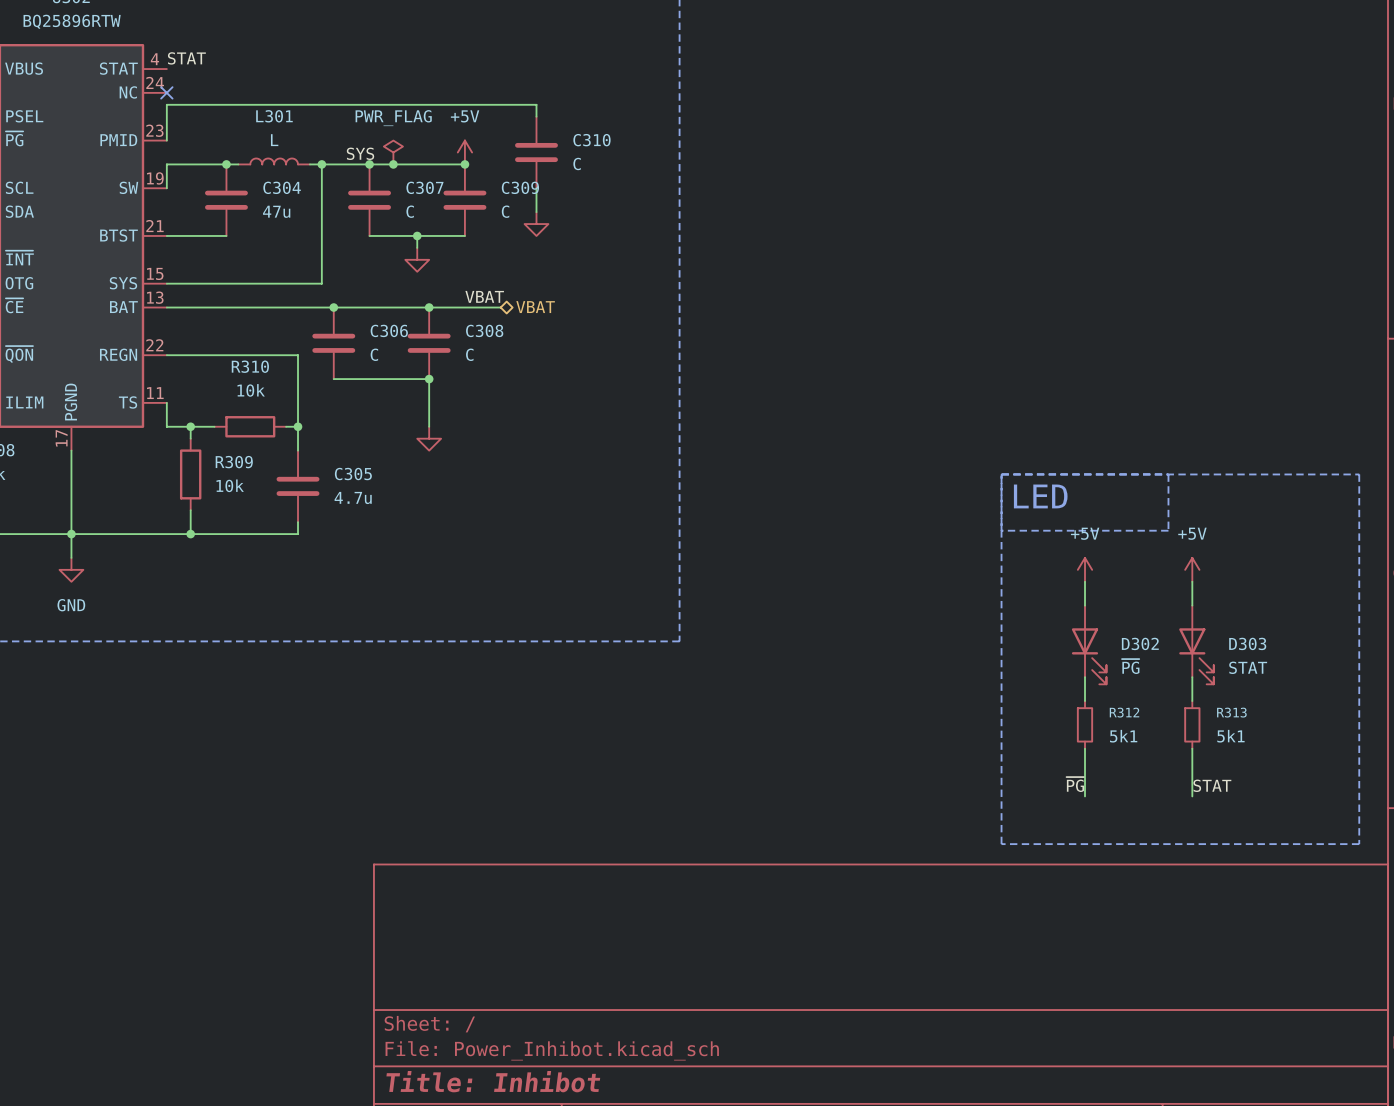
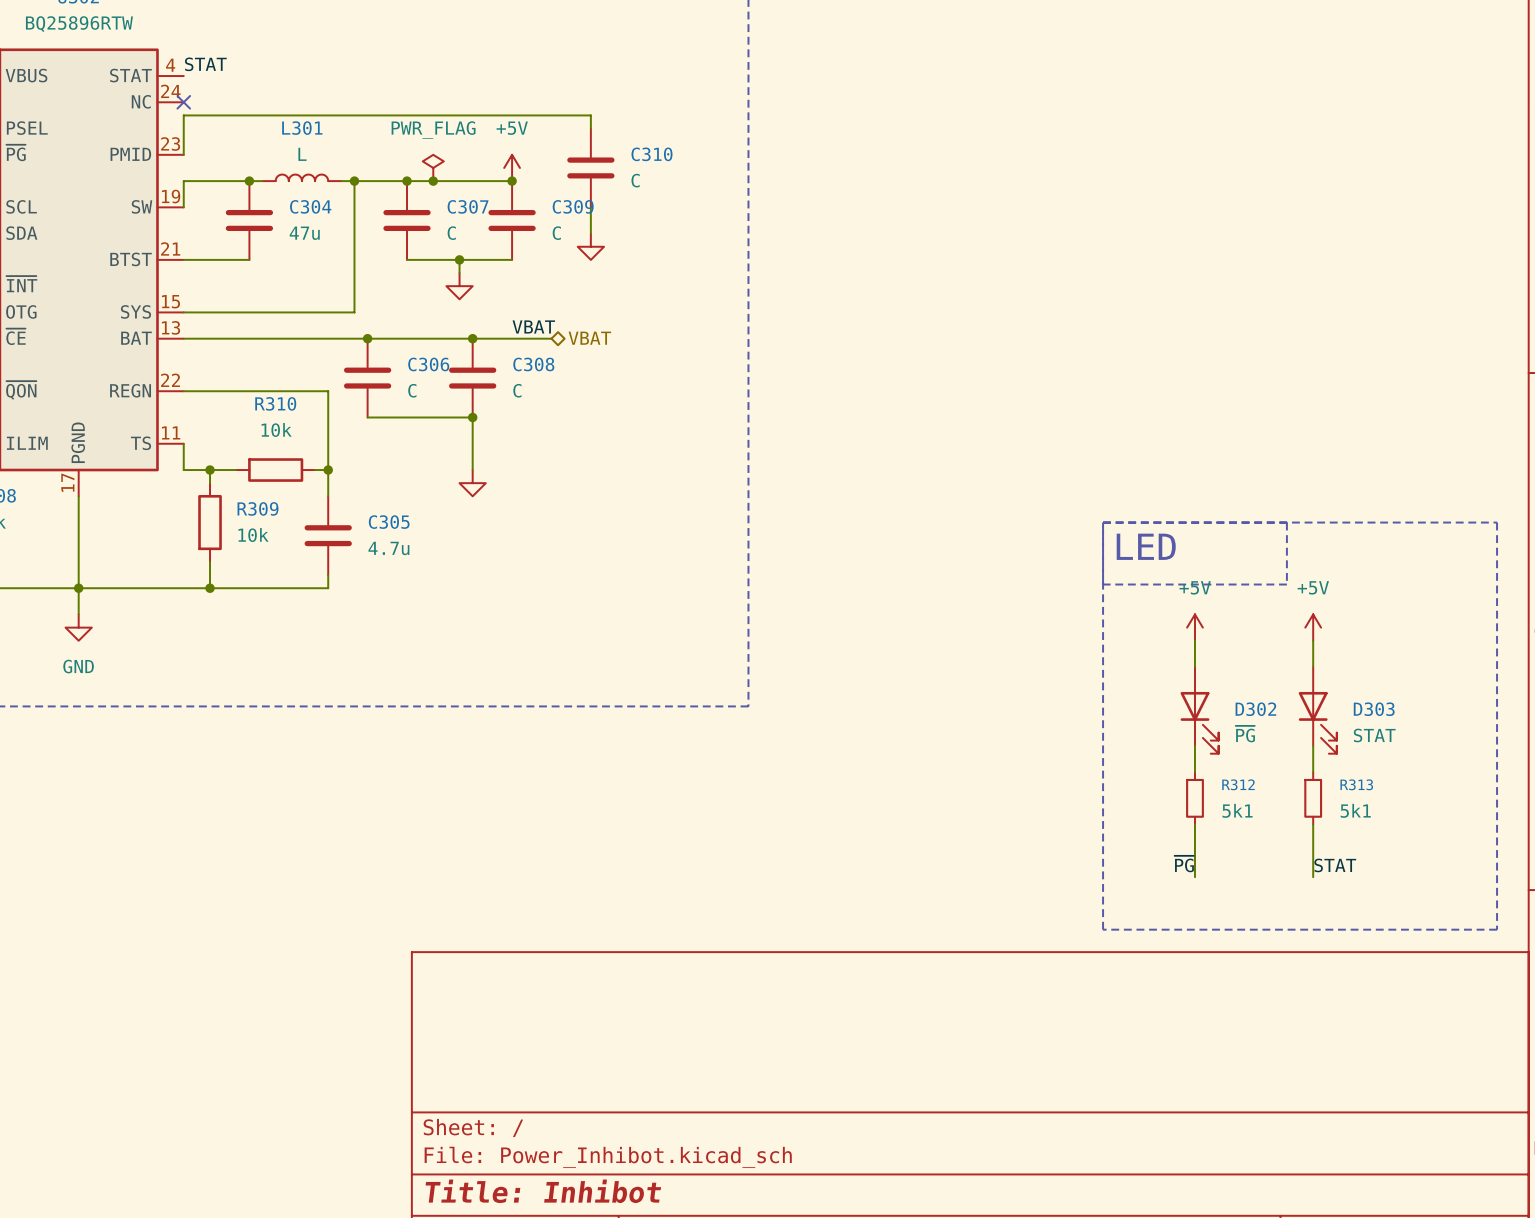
label: SYS (360, 153) -> none

